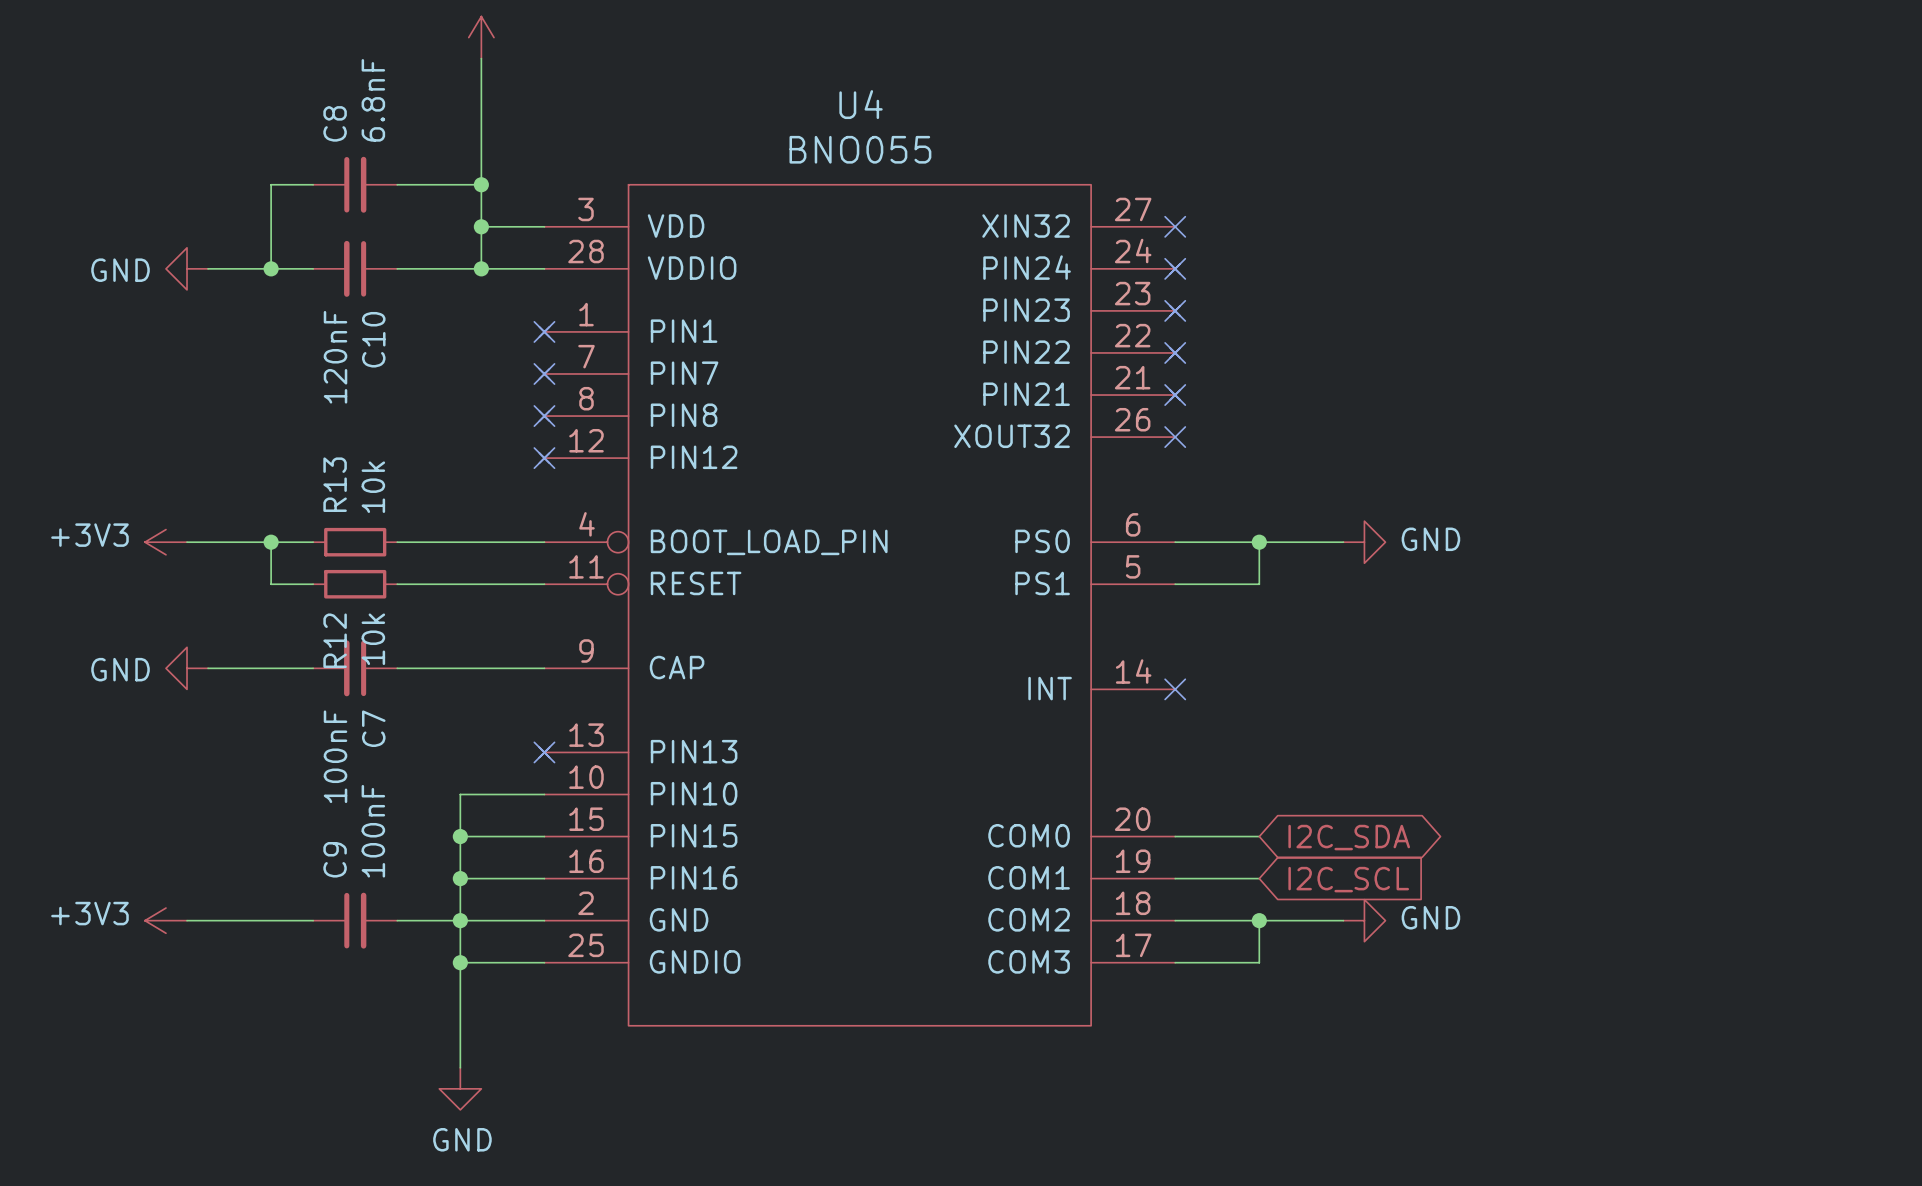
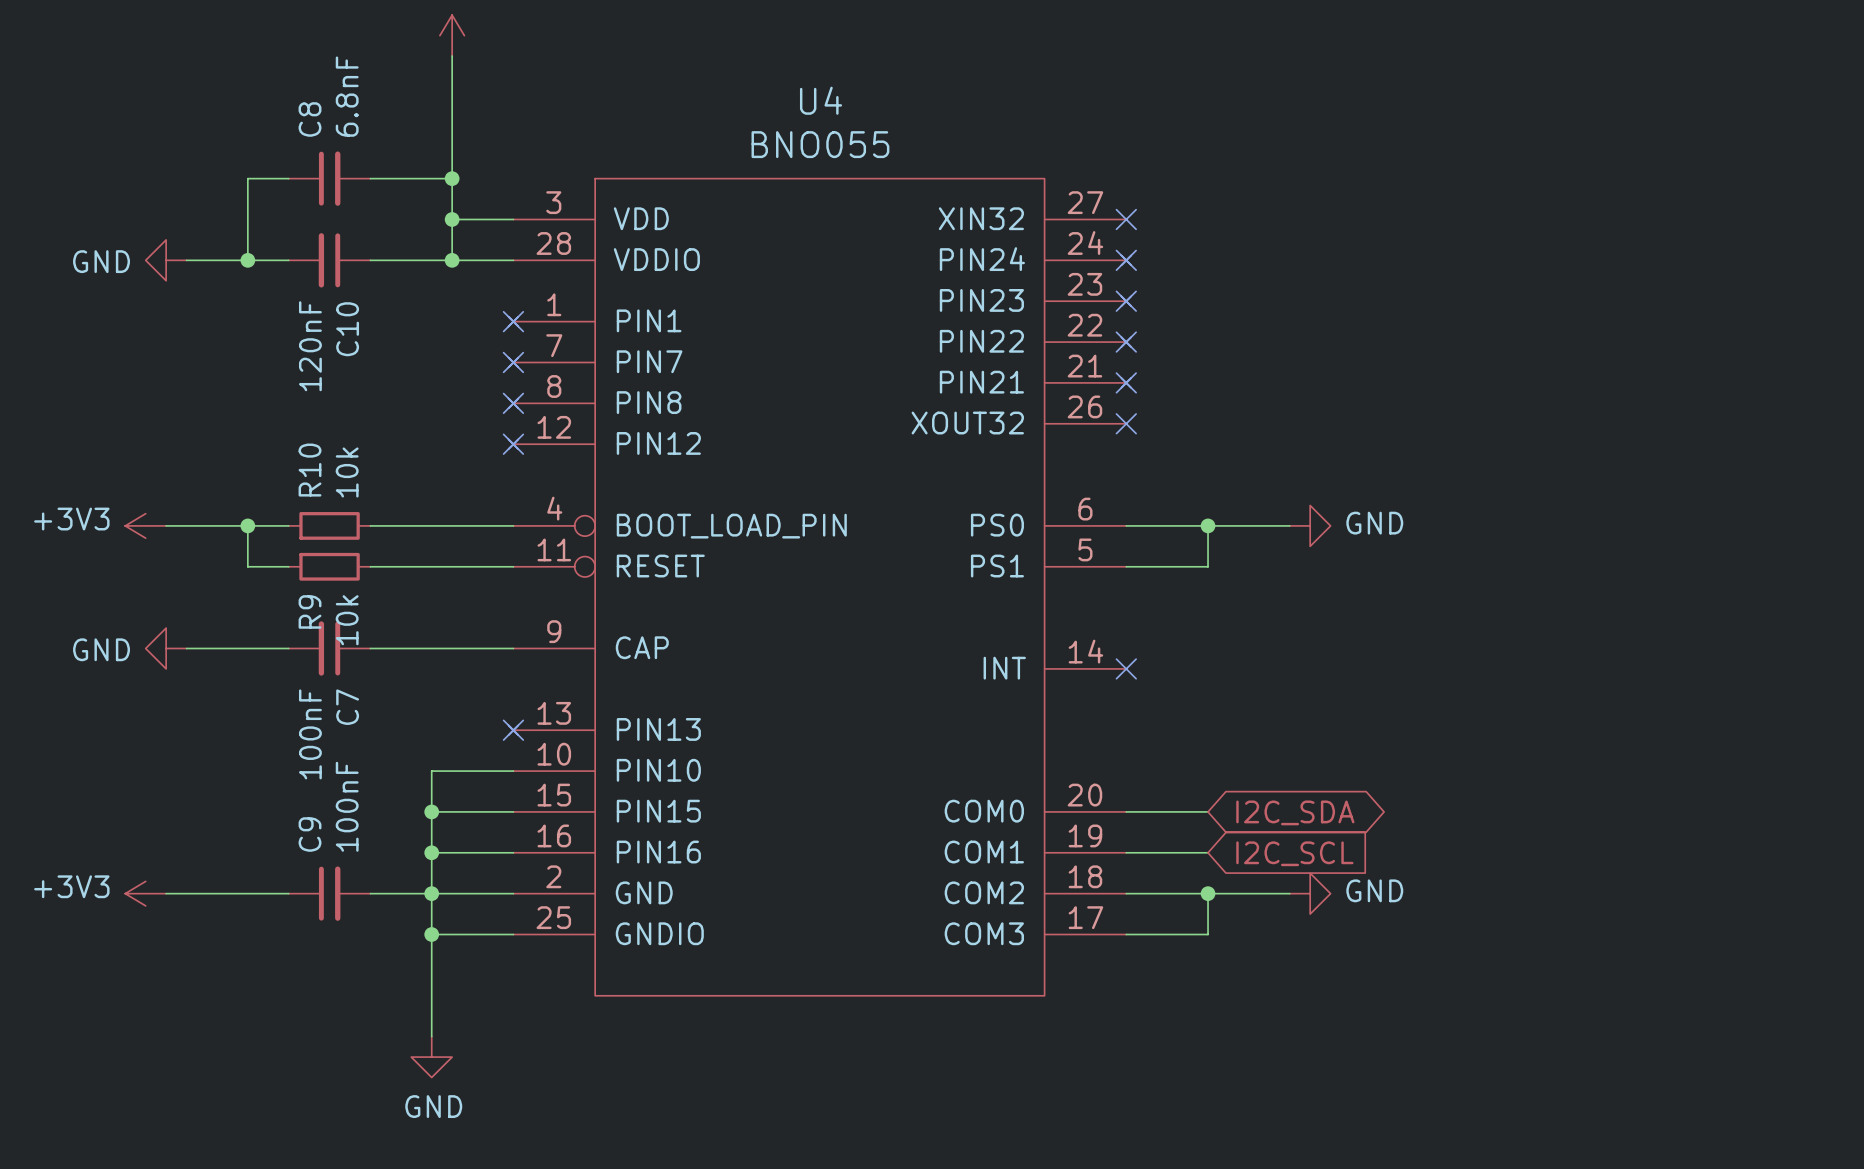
R13 name: R13 (335, 484) -> R10 (310, 470)
R12 name: R12 (335, 640) -> R9 (310, 611)

